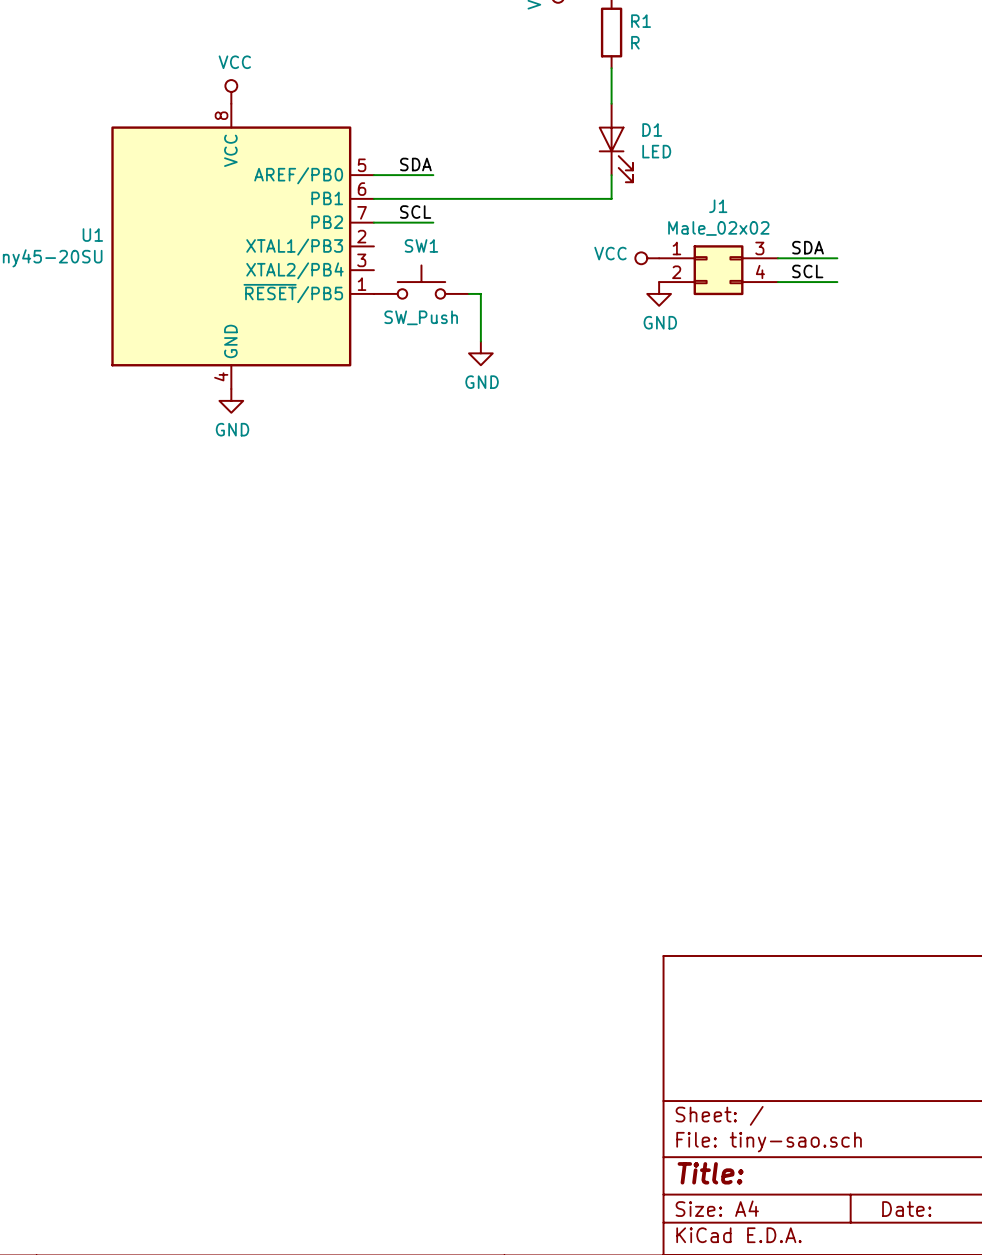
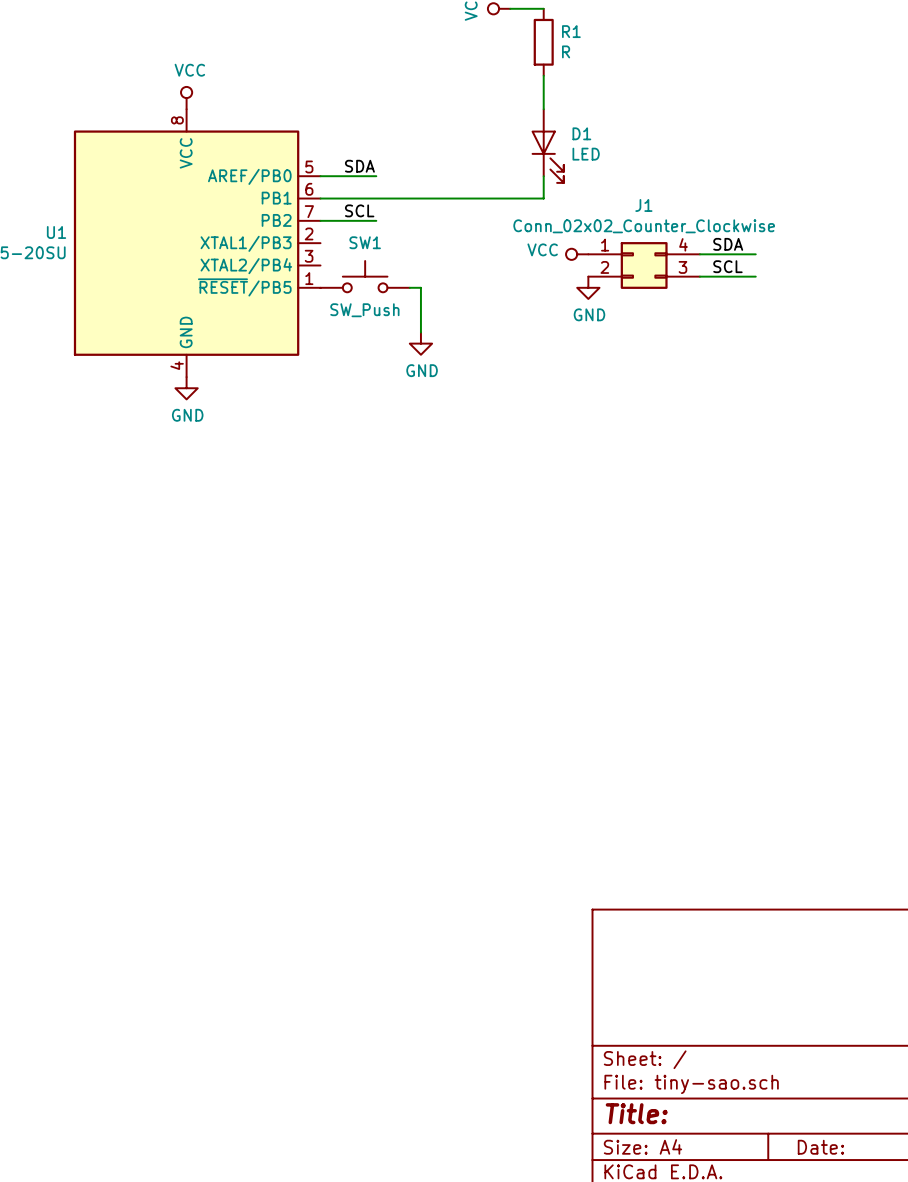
J1 value: Male_02x02 (718, 228) -> Conn_02x02_Counter_Clockwise (644, 226)
J1 pin number: 3 (759, 248) -> 4 (683, 244)
J1 pin number: 4 (760, 271) -> 3 (682, 267)

